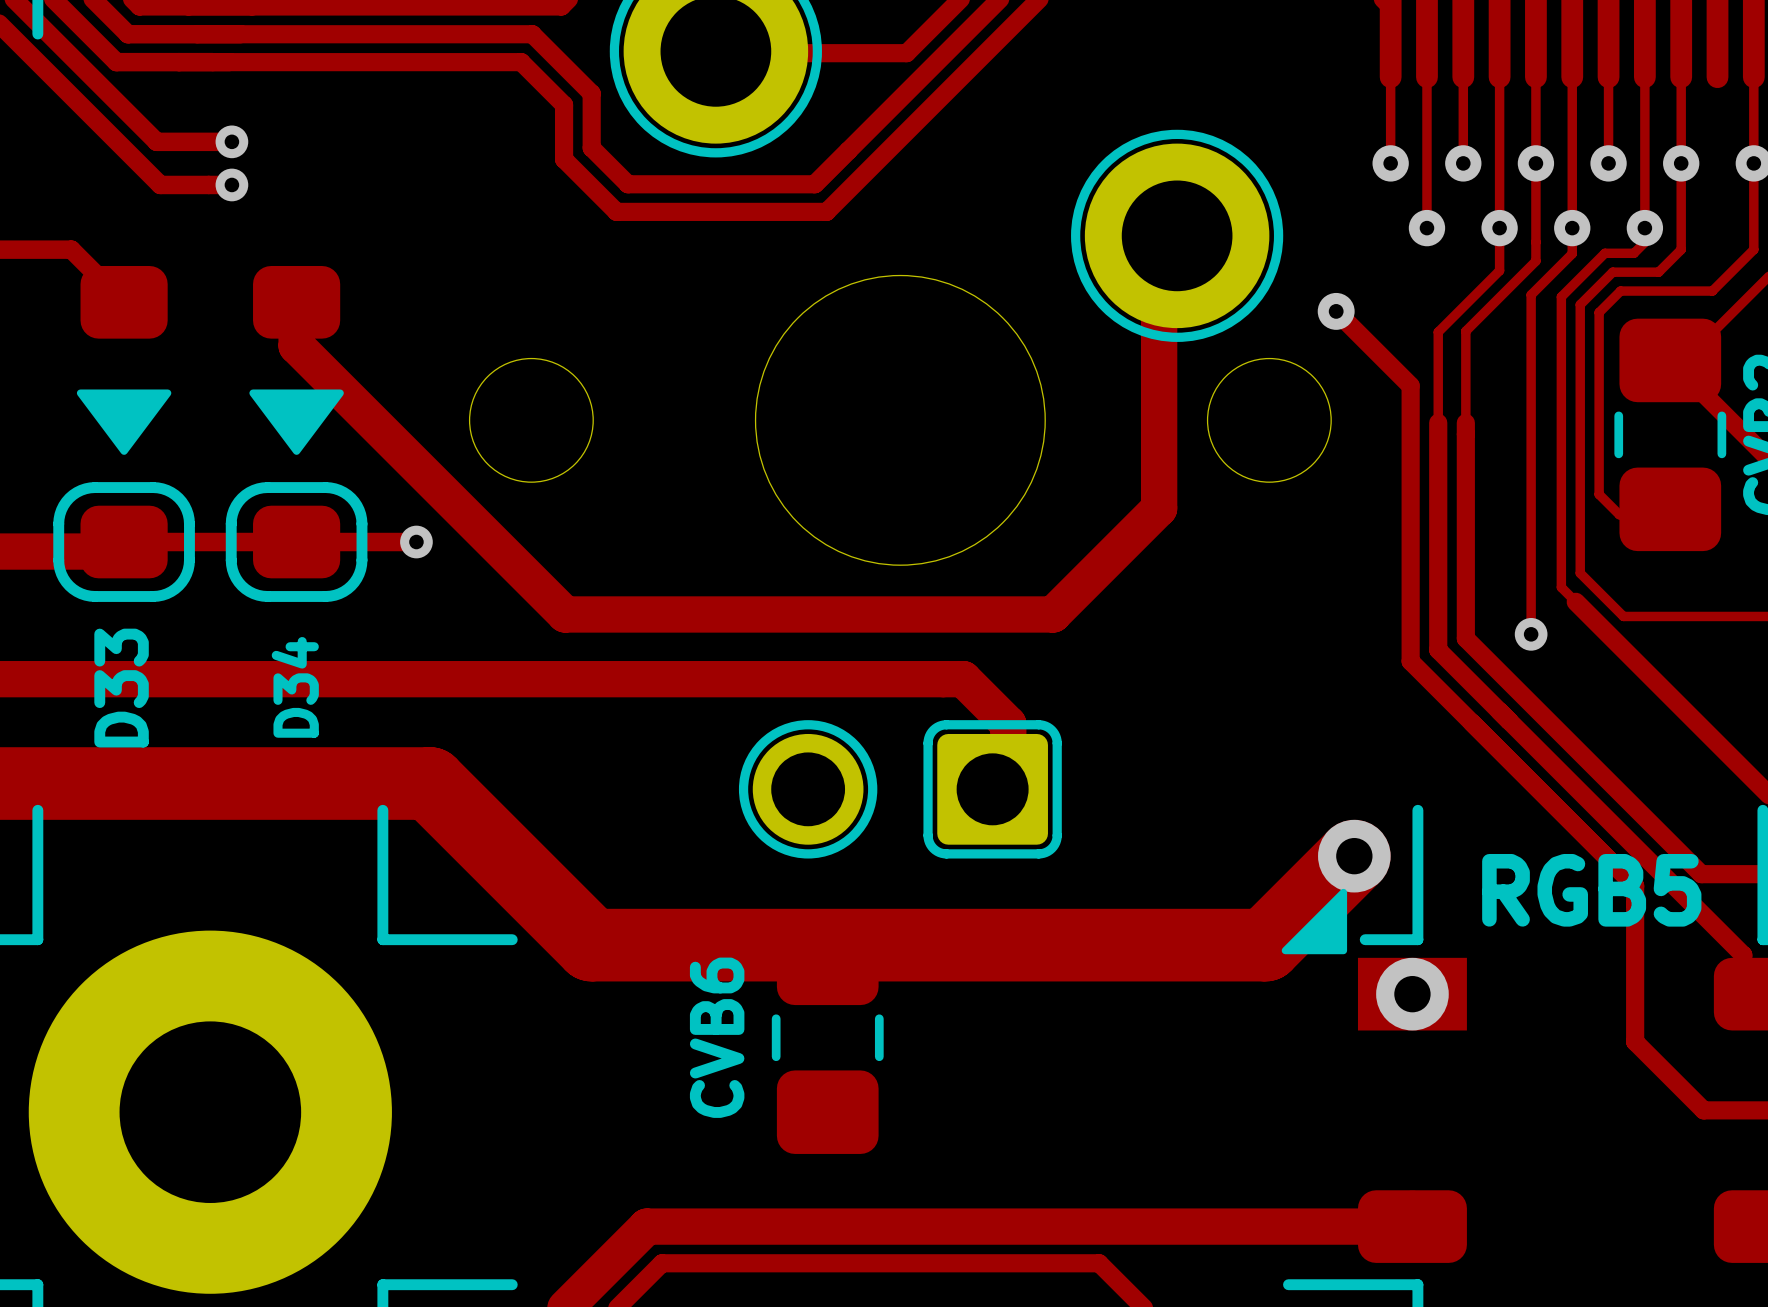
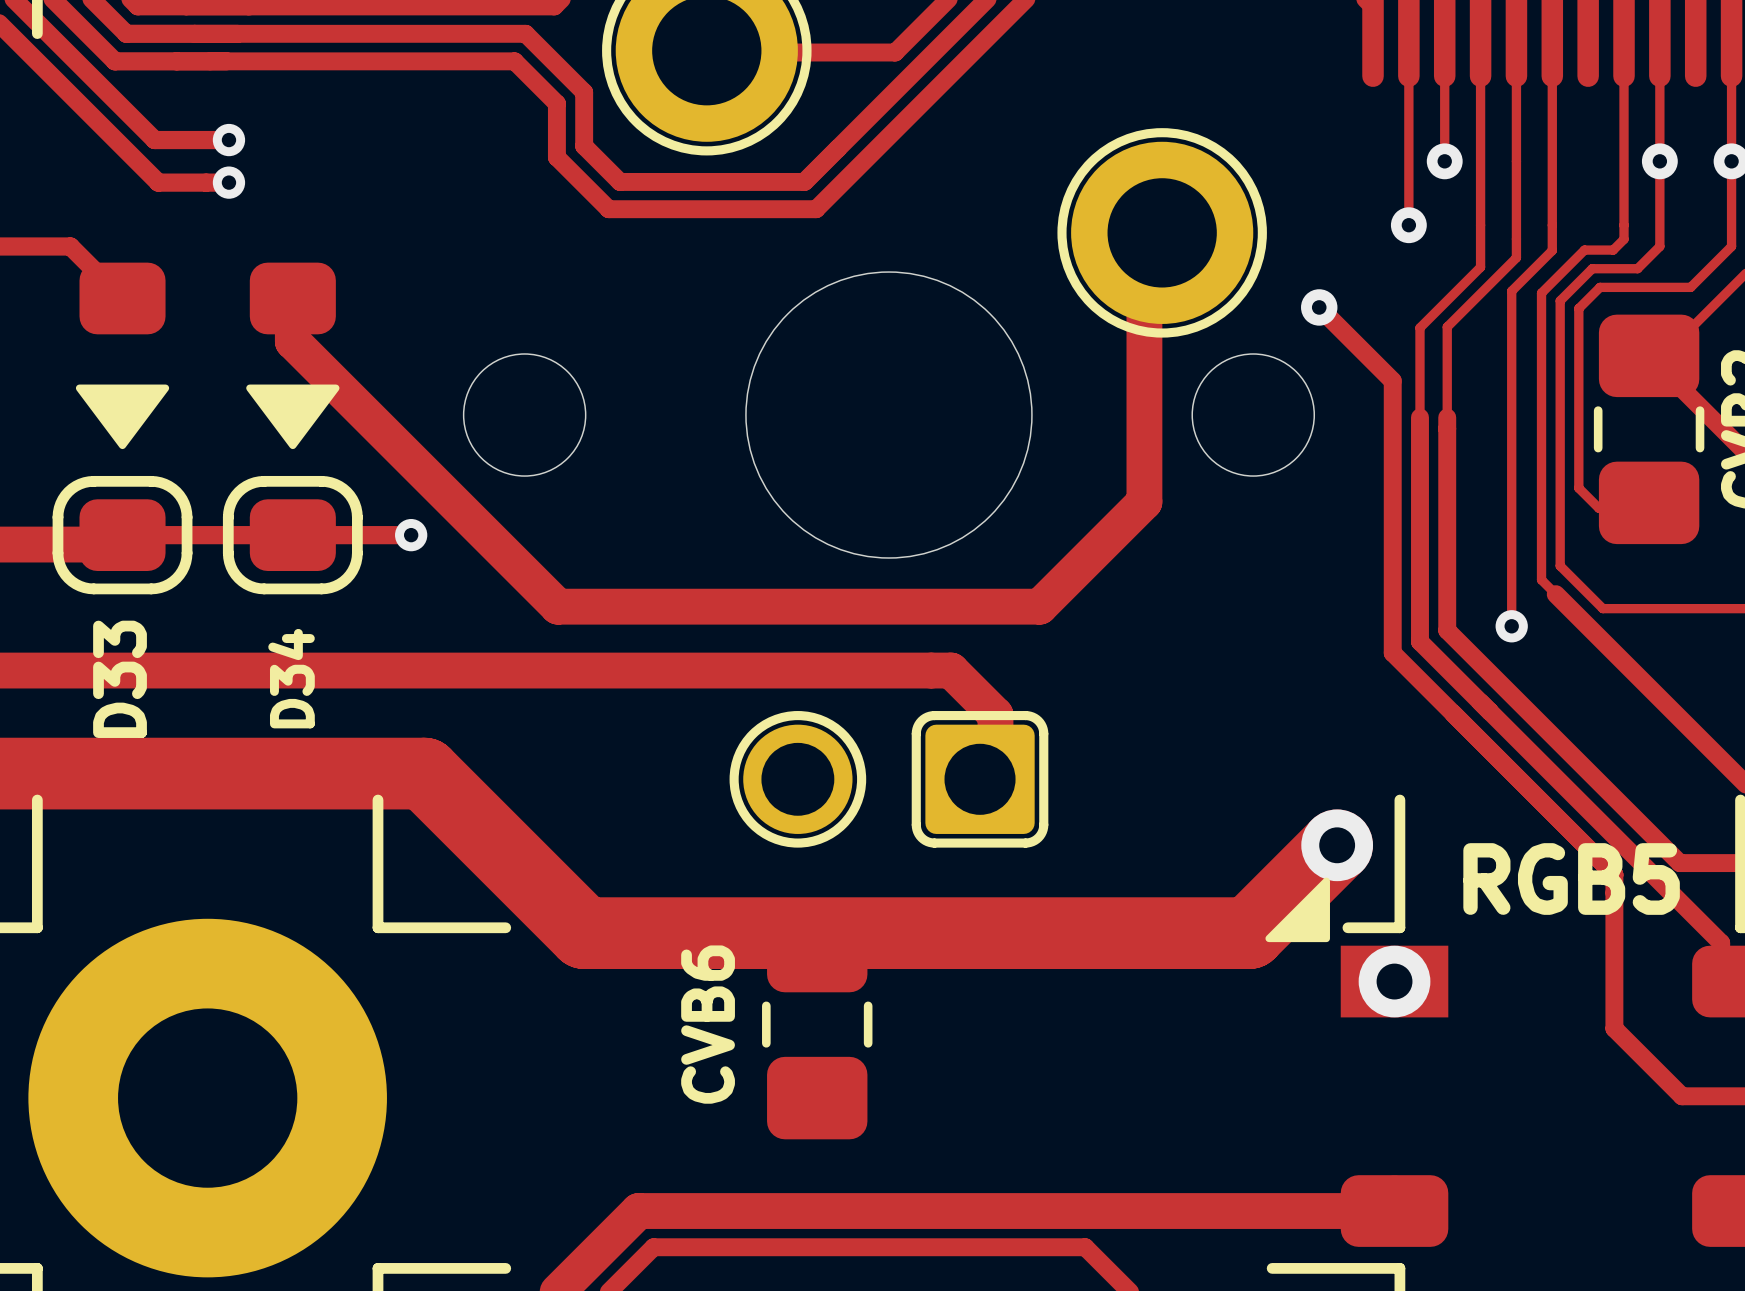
track: (1390, 48) (1390, 163) -> none
track: (1608, 48) (1608, 163) -> none
via: (1390, 163) -> none
via: (1535, 163) -> none
via: (1608, 163) -> none
via: (1499, 228) -> none
via: (1572, 228) -> none
via: (1644, 228) -> none

